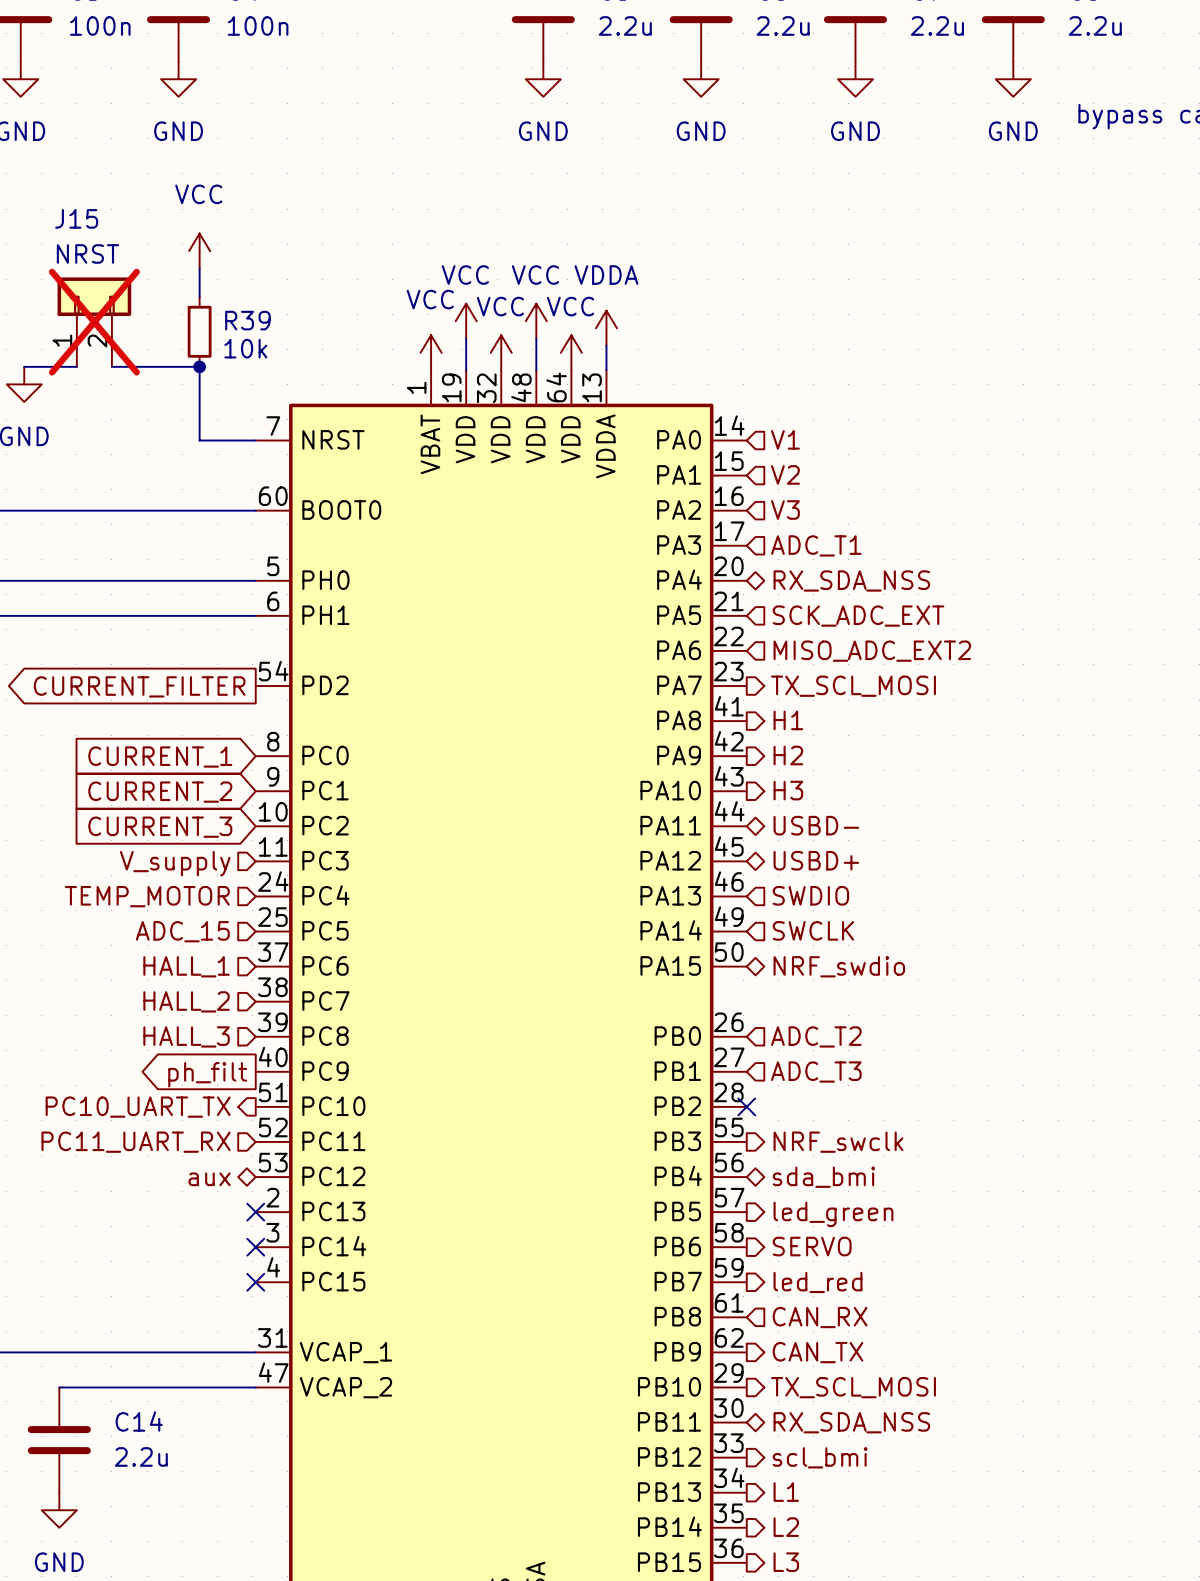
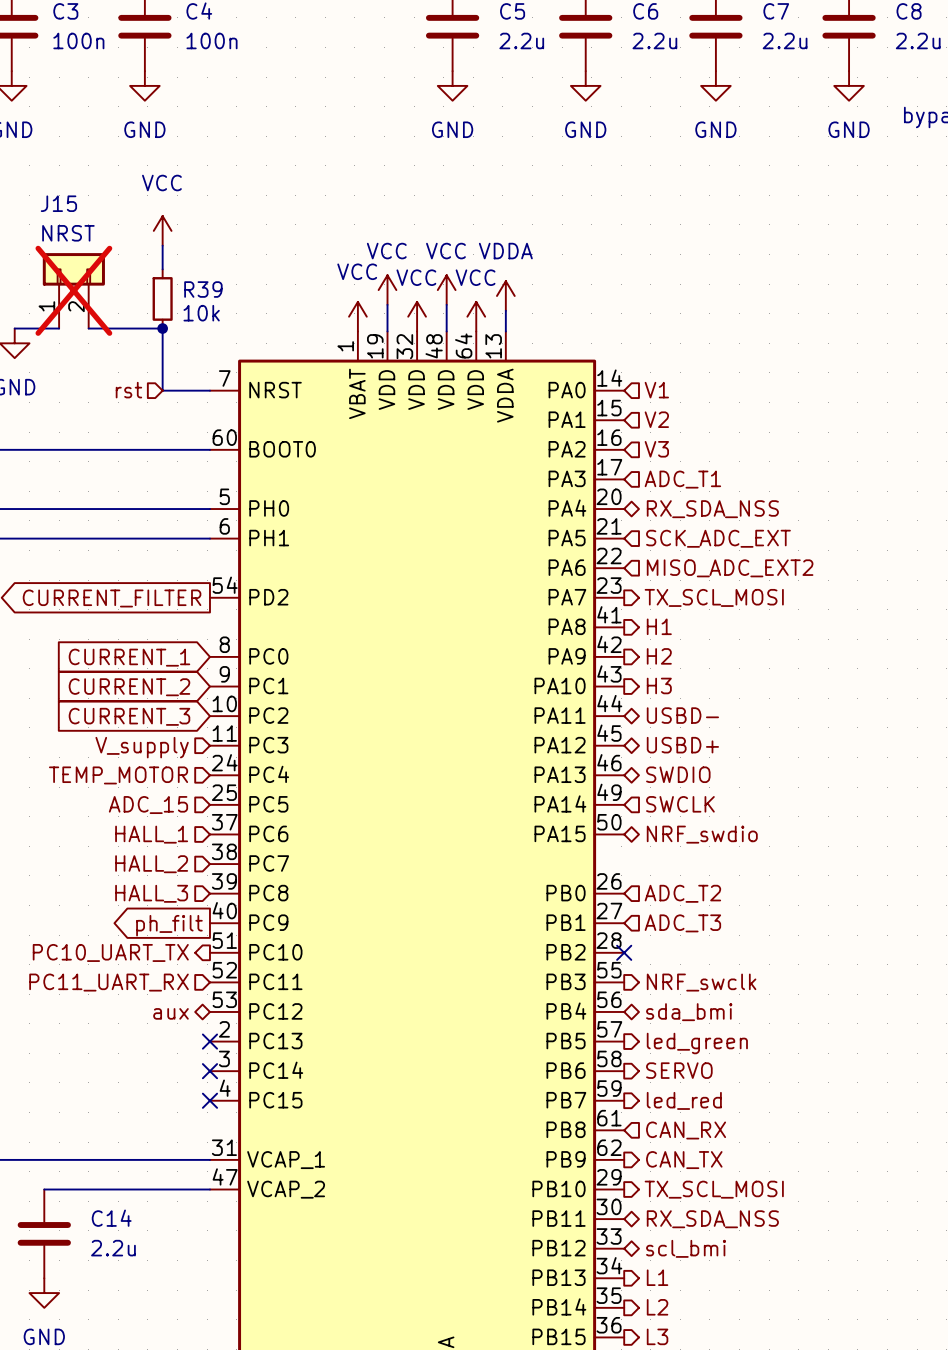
hierarchical label: none -> rst (128, 390)
hierarchical label shape: input (810, 895) -> bidirectional (678, 774)
hierarchical label shape: output (820, 1457) -> bidirectional (686, 1248)

